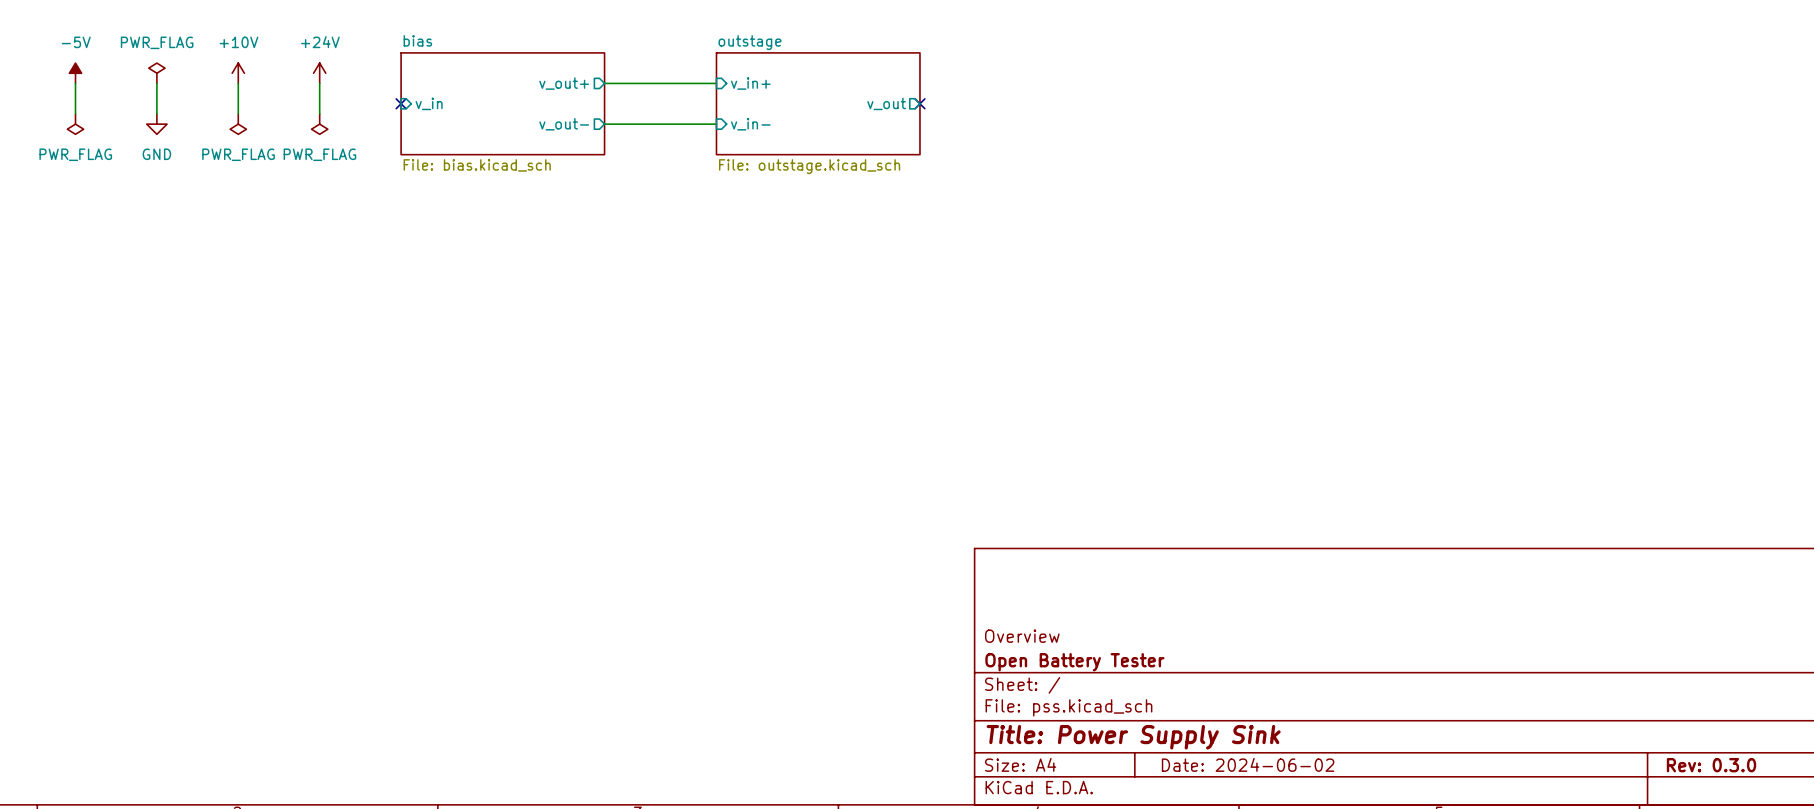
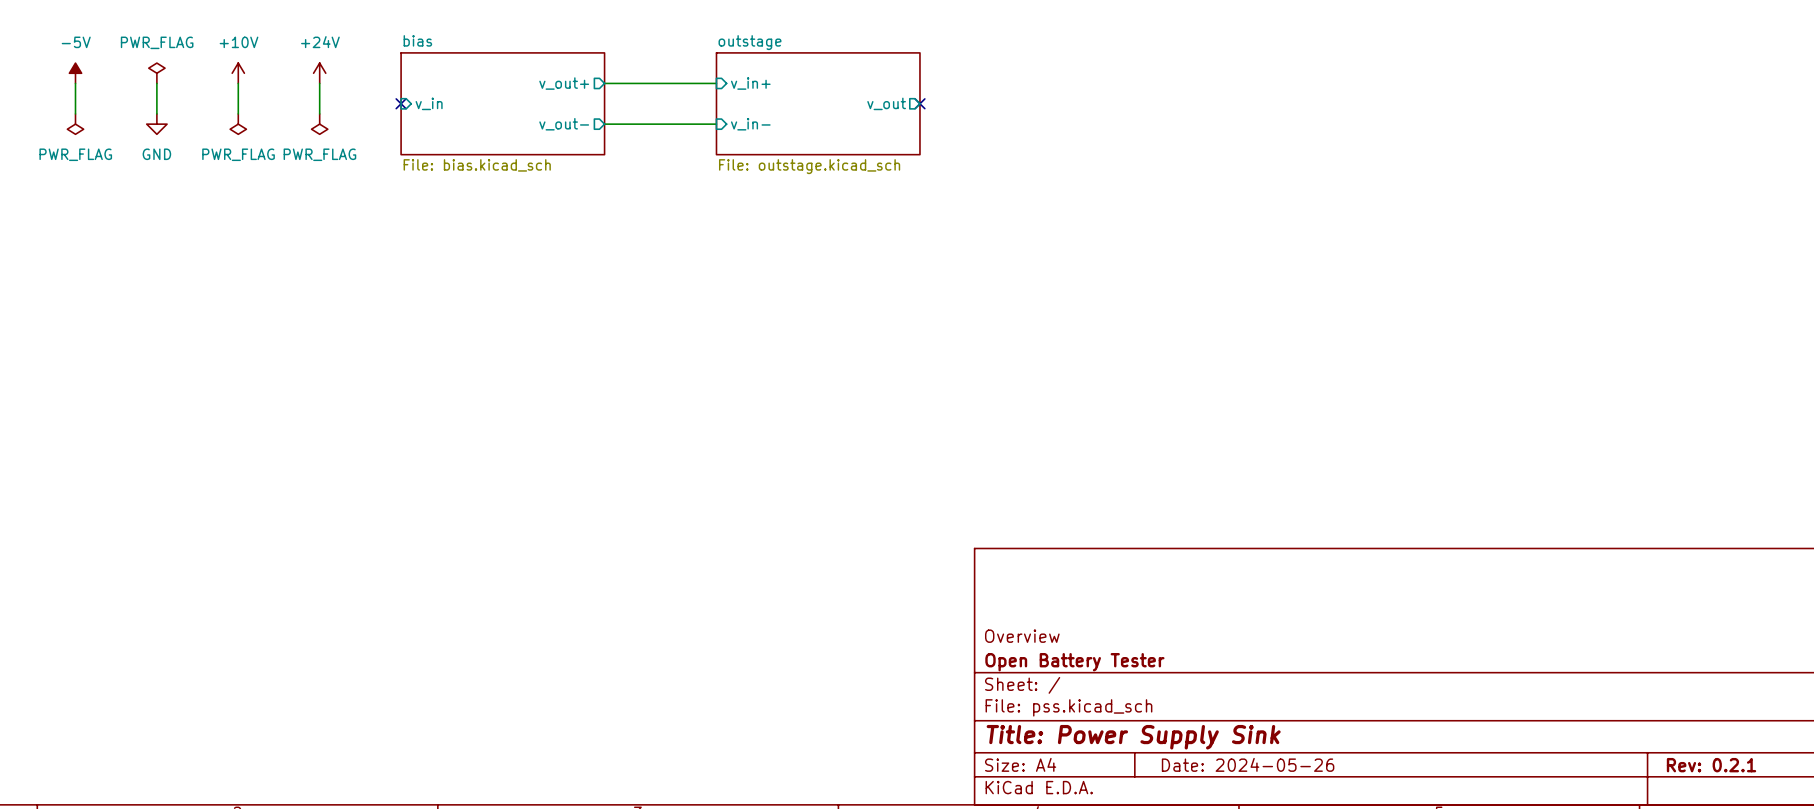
title block: Date: 2024-06-02 (1248, 764) -> Date: 2024-05-26 (1248, 764)
title block: Rev: 0.3.0 (1711, 765) -> Rev: 0.2.1 (1711, 765)

